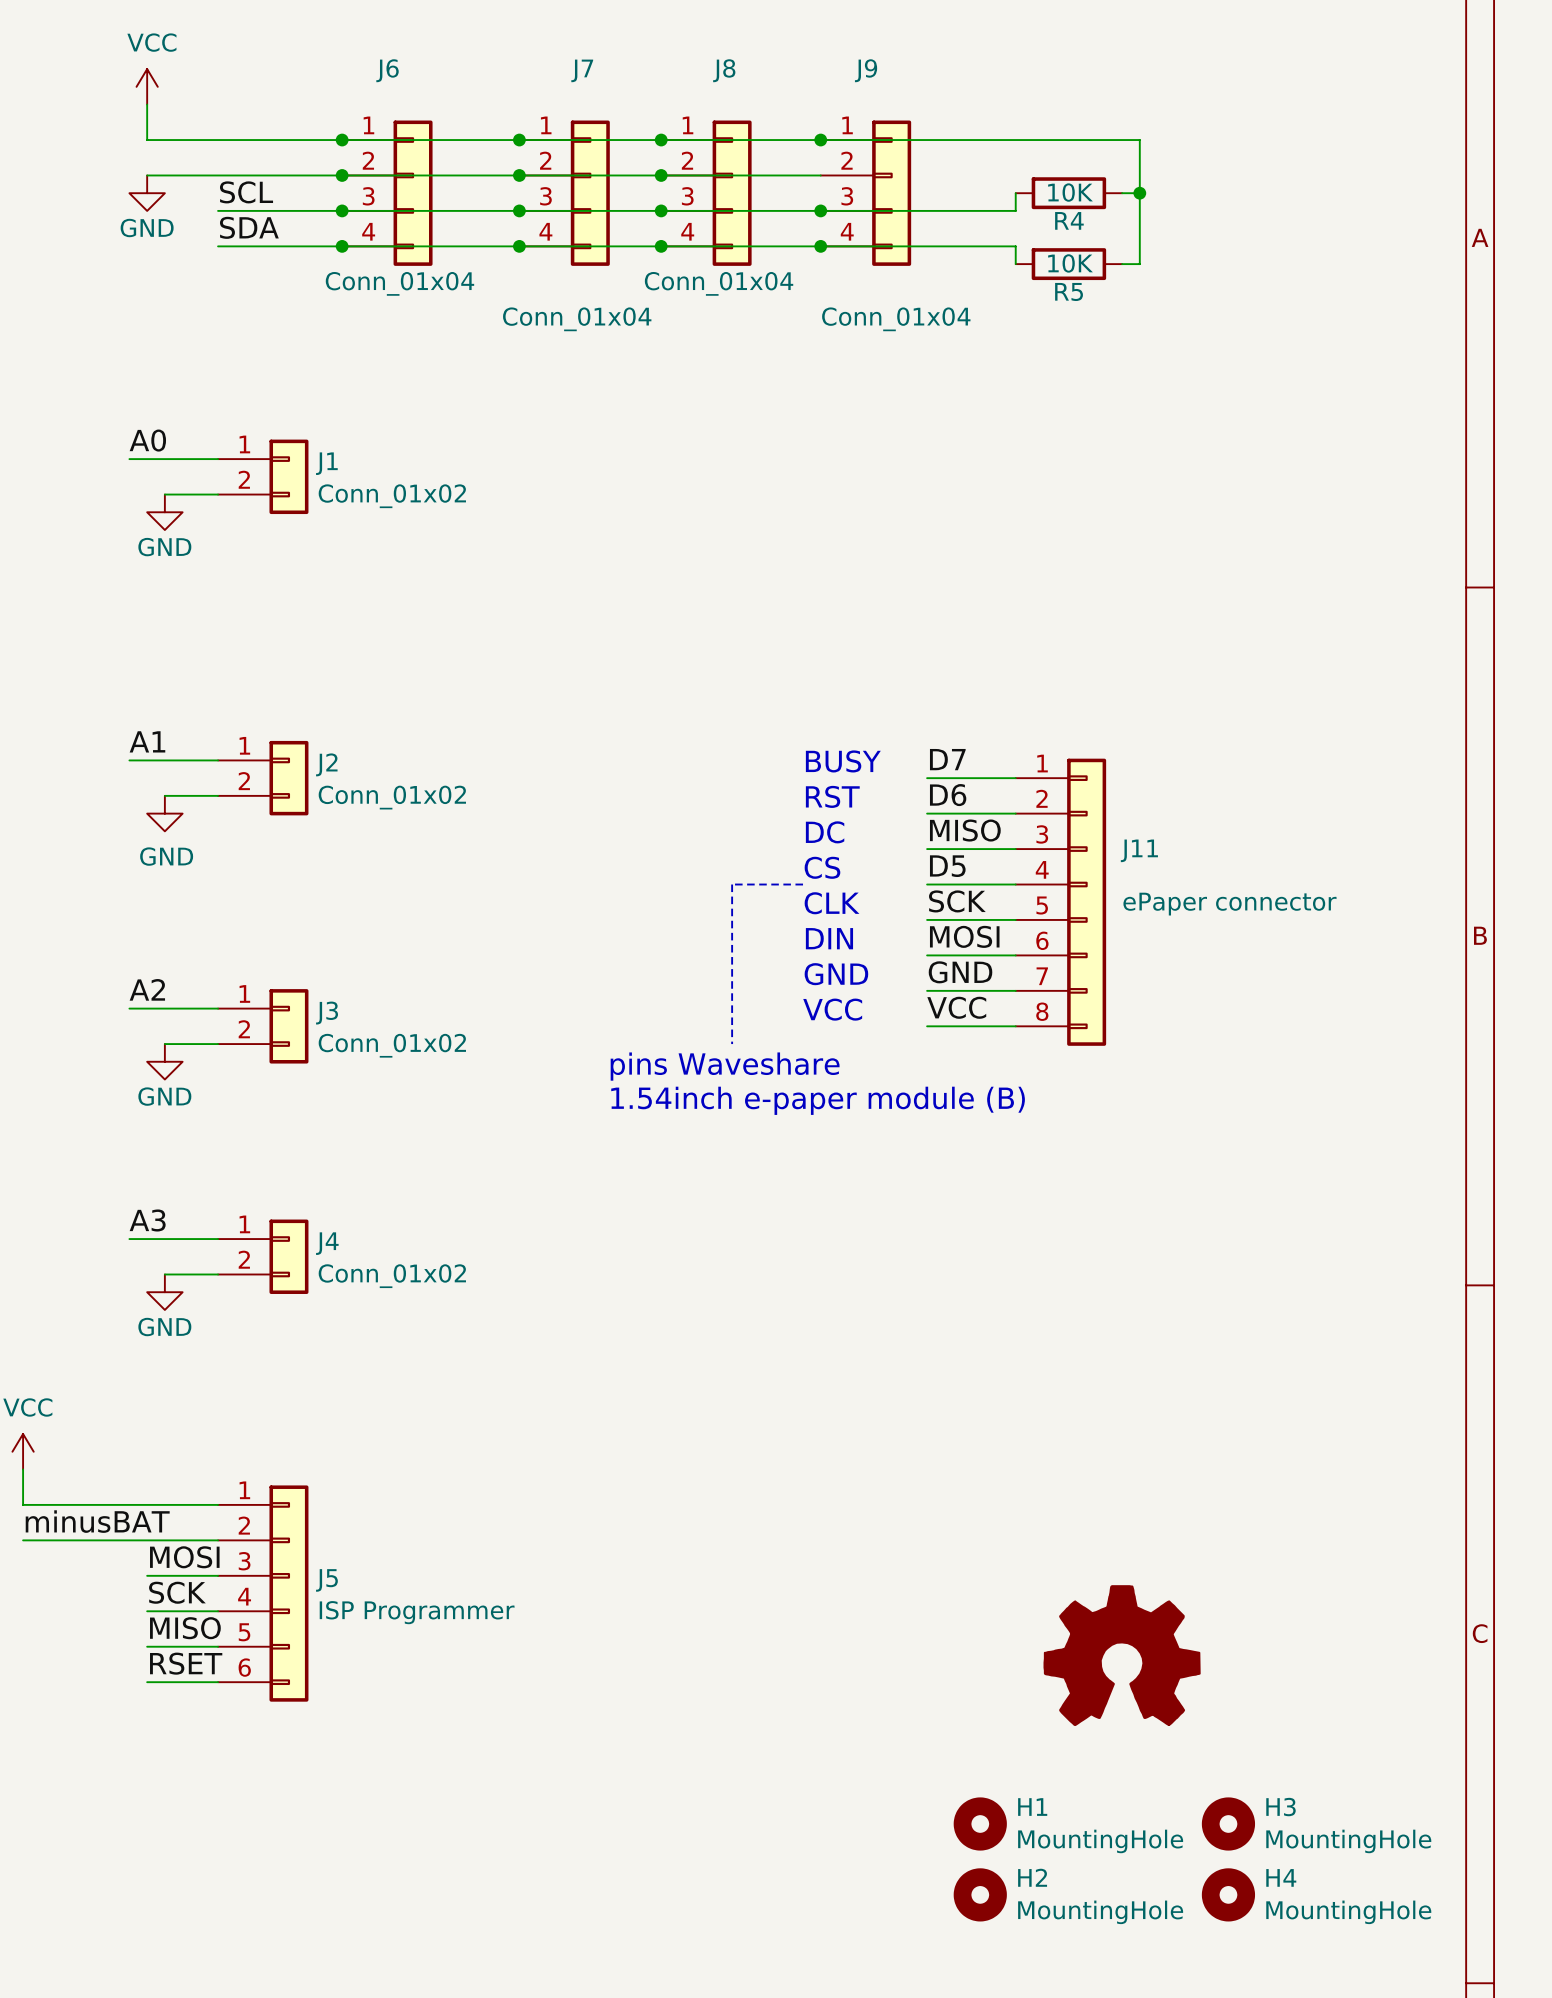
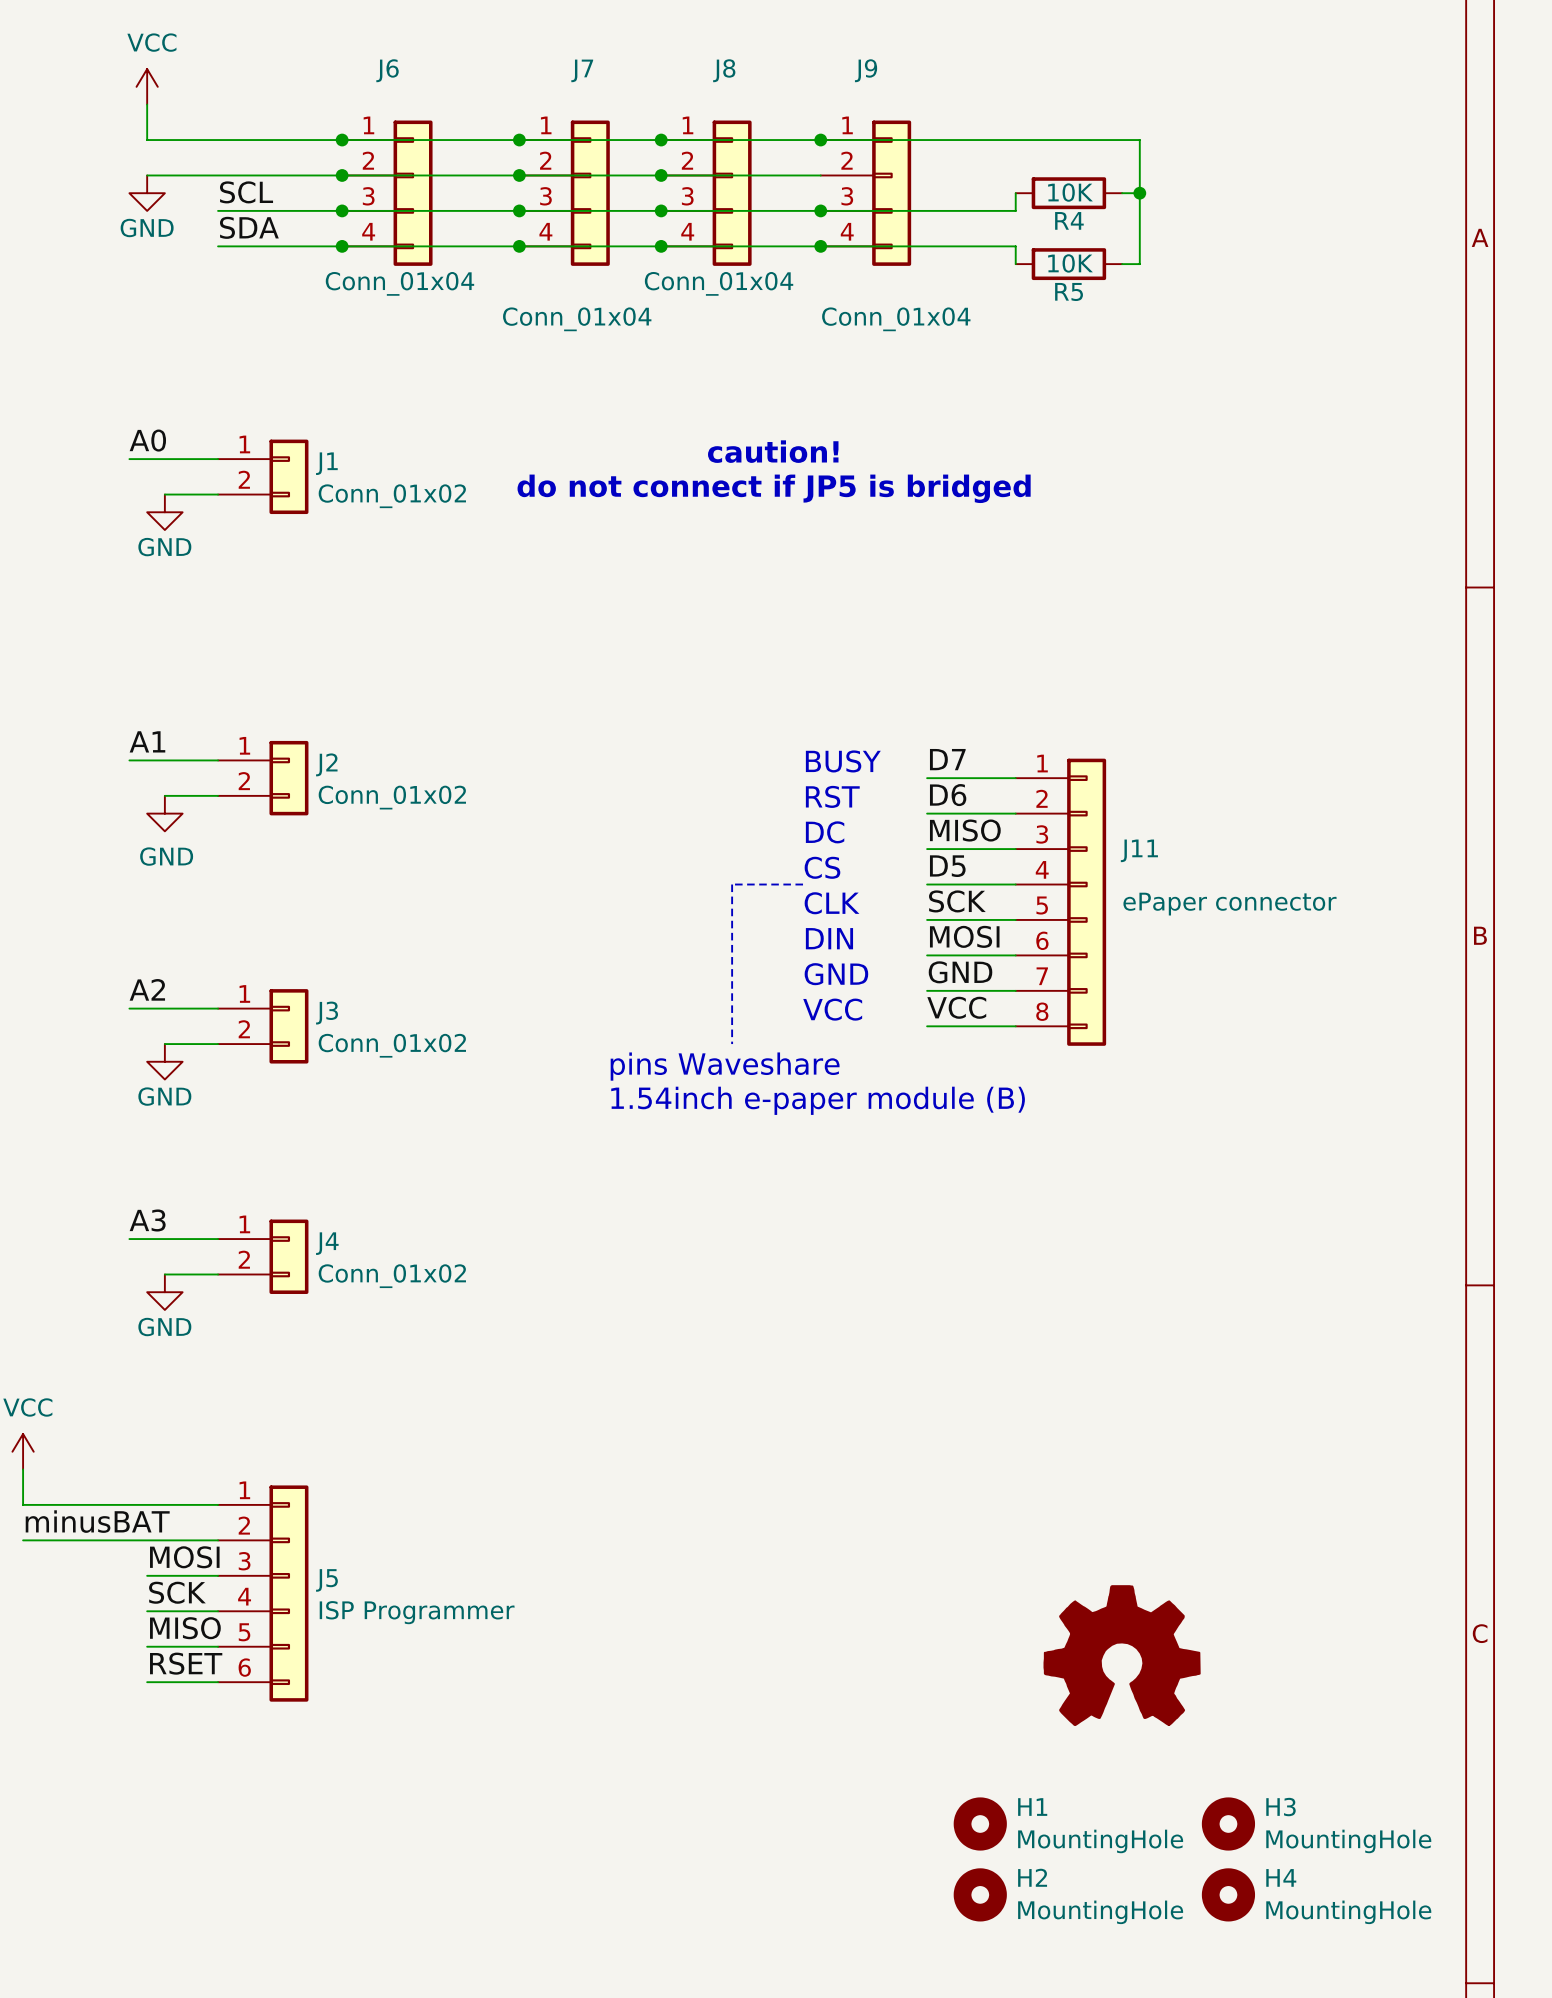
text: none -> caution! (773, 451)
text: none -> do not connect if JP5 is bridged (774, 488)

